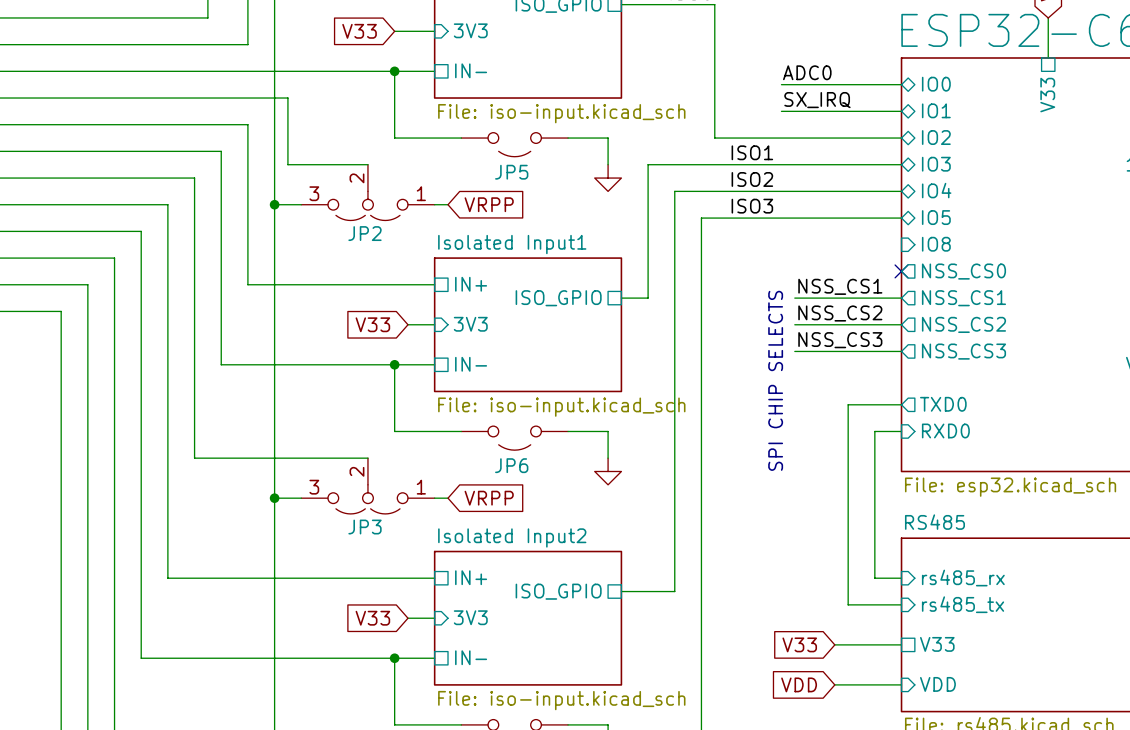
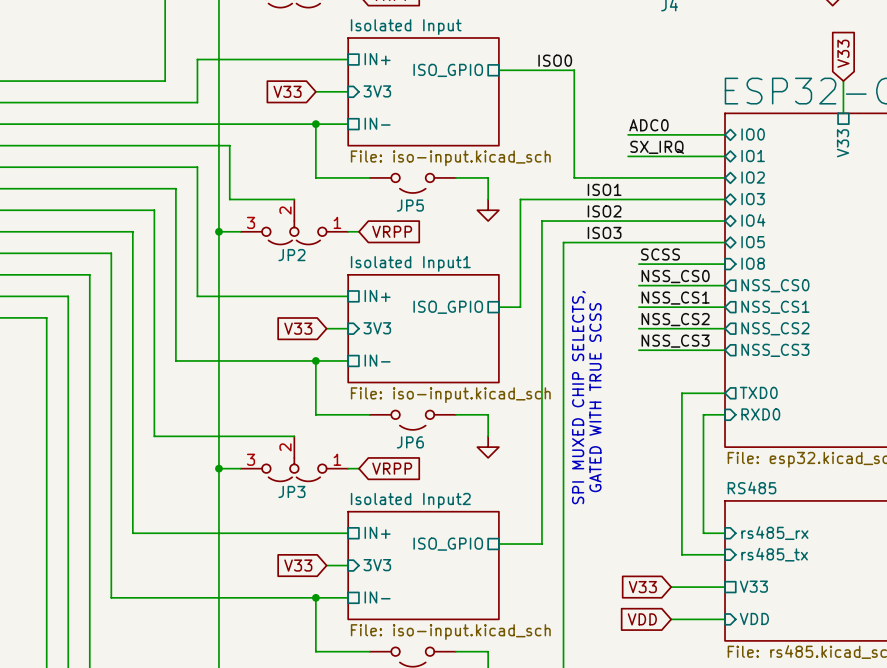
label: none -> SCSS (660, 254)
wire: none -> (638, 264) (725, 264)
label: none -> NSS_CS0 (675, 276)
wire: none -> (638, 285) (725, 285)
no-connect mark: (901, 271) -> none
text: SPI CHIP SELECTS (775, 380) -> none
text: none -> SPI MUXED CHIP SELECTS, (578, 397)
text: none -> GATED WITH TRUE SCSS (595, 397)

